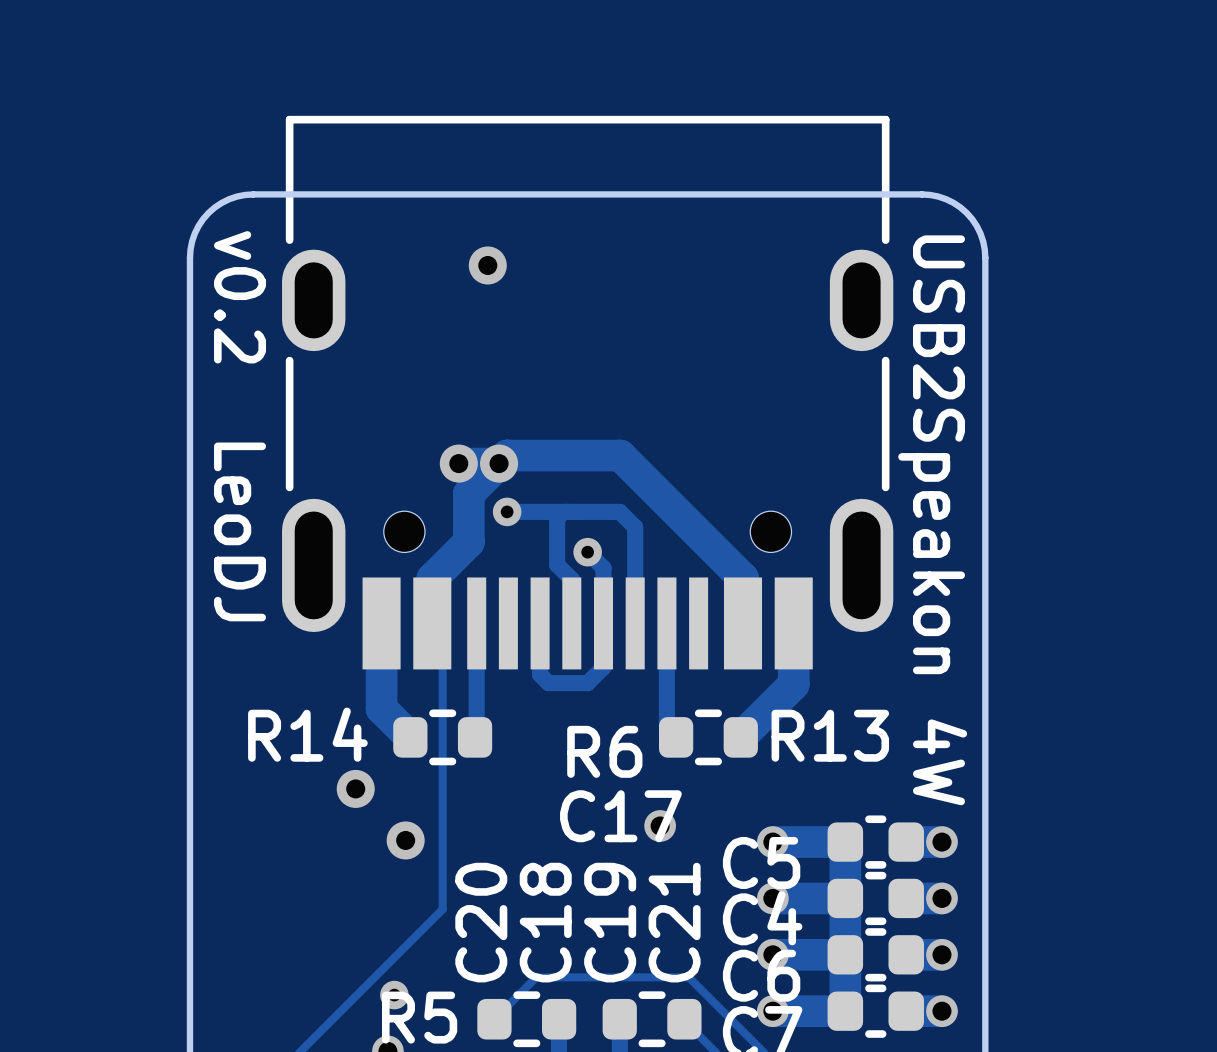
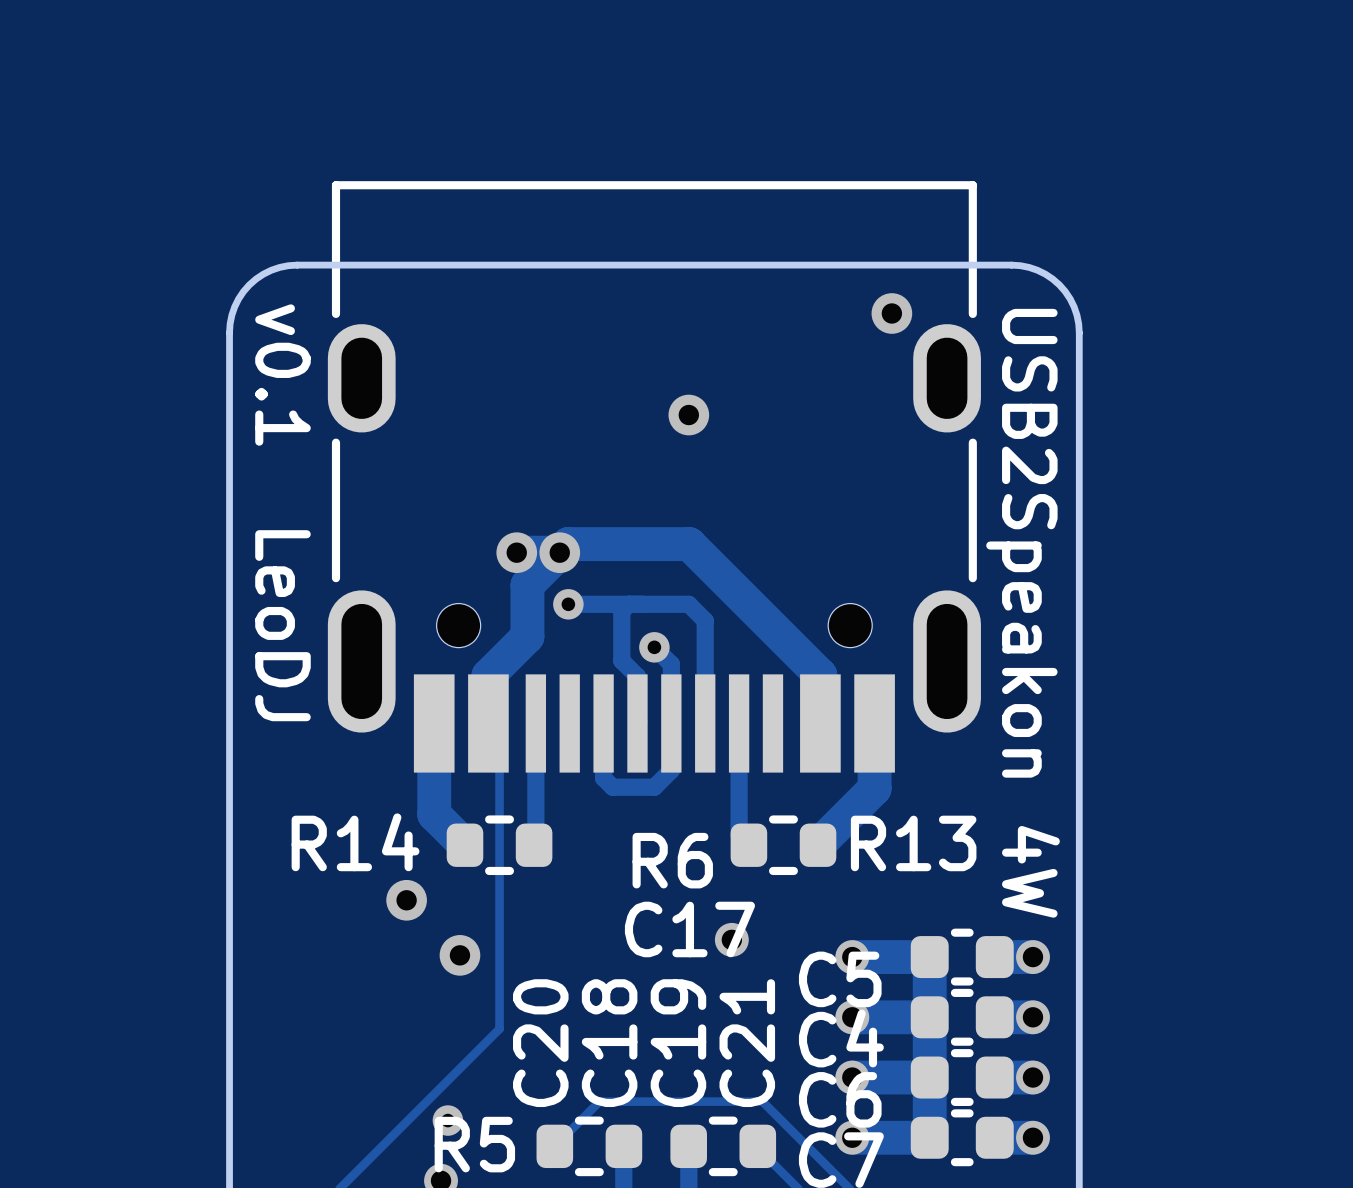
via: none -> (891, 313)
via position: (487, 265) -> (688, 415)
text: v0.2 LeoDJ (240, 426) -> v0.1 LeoDJ (282, 512)

